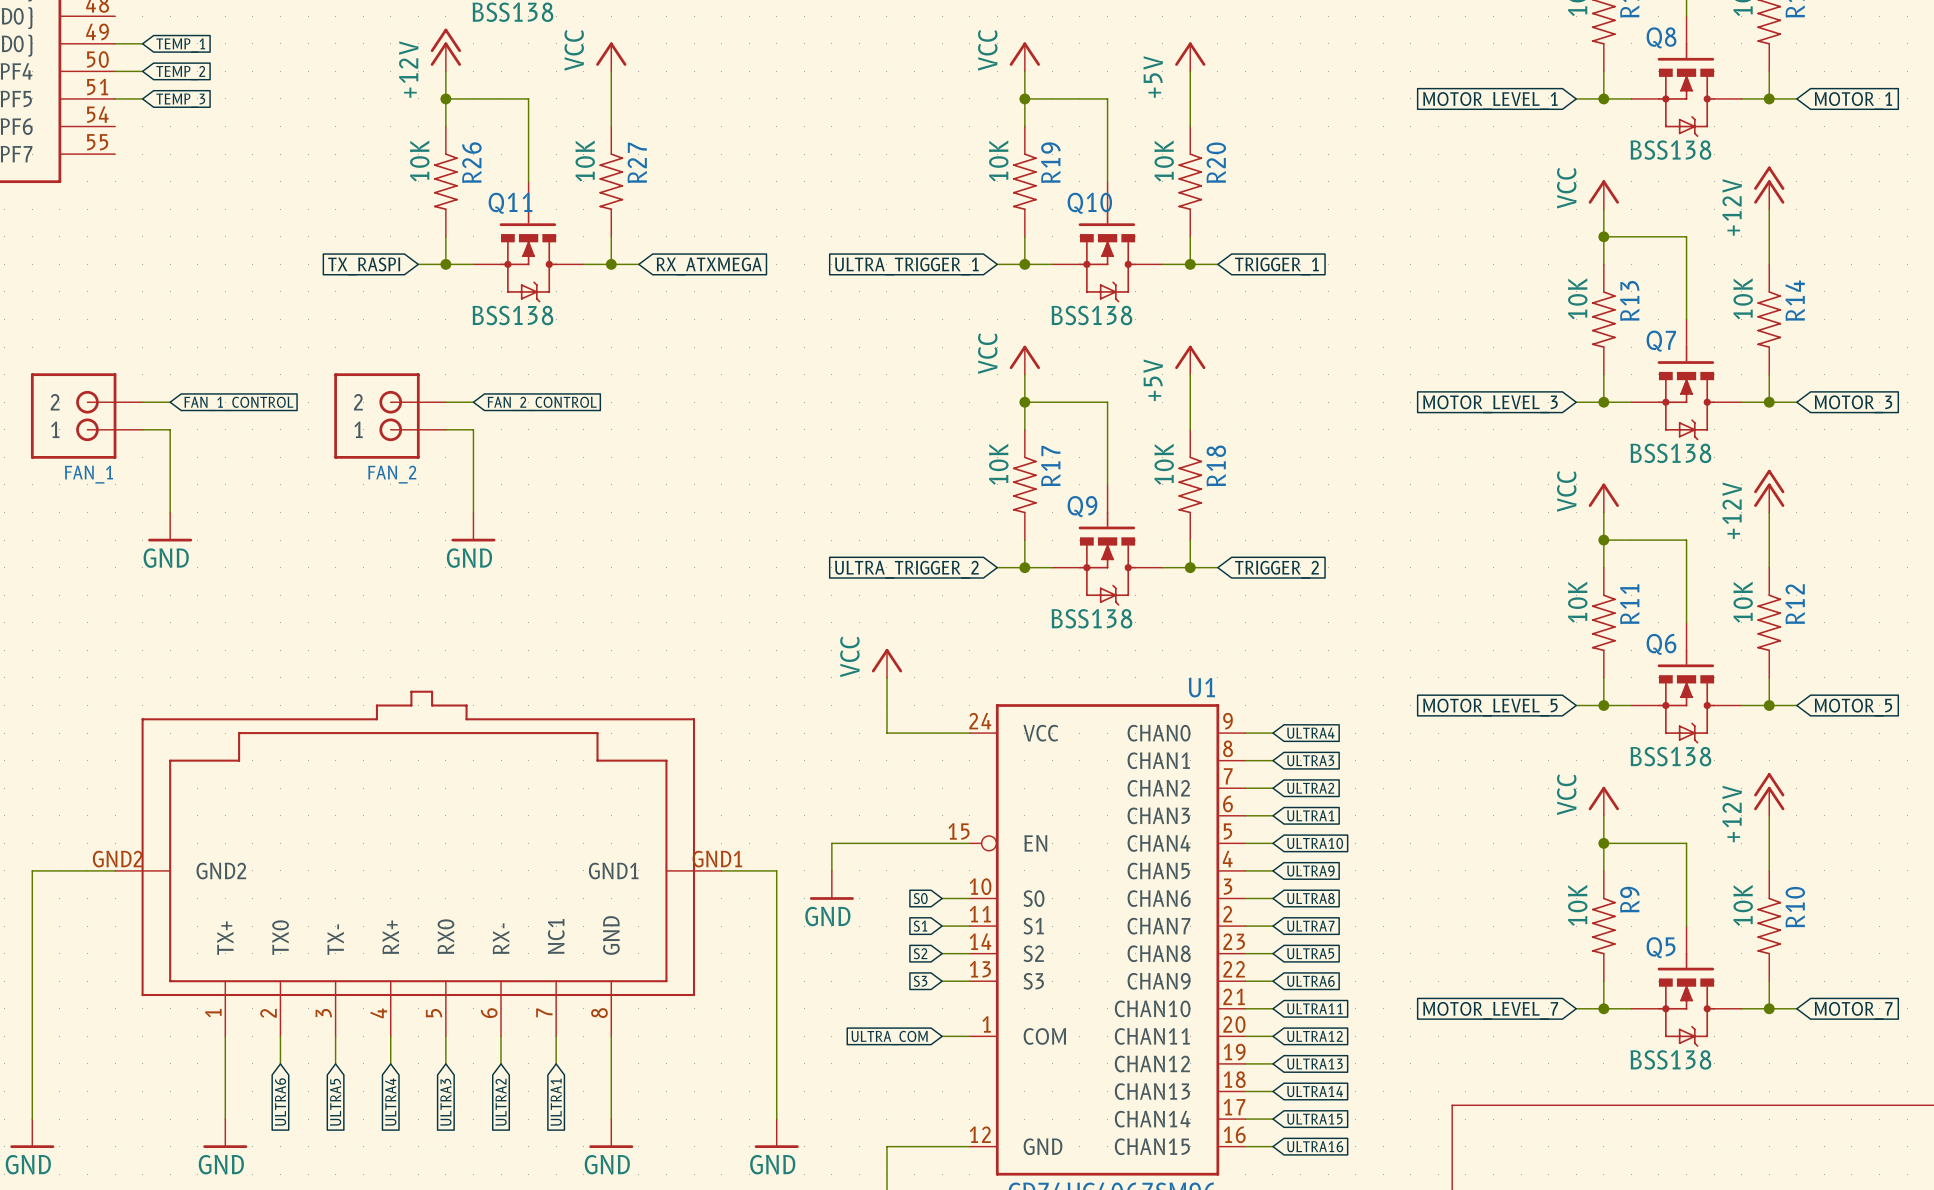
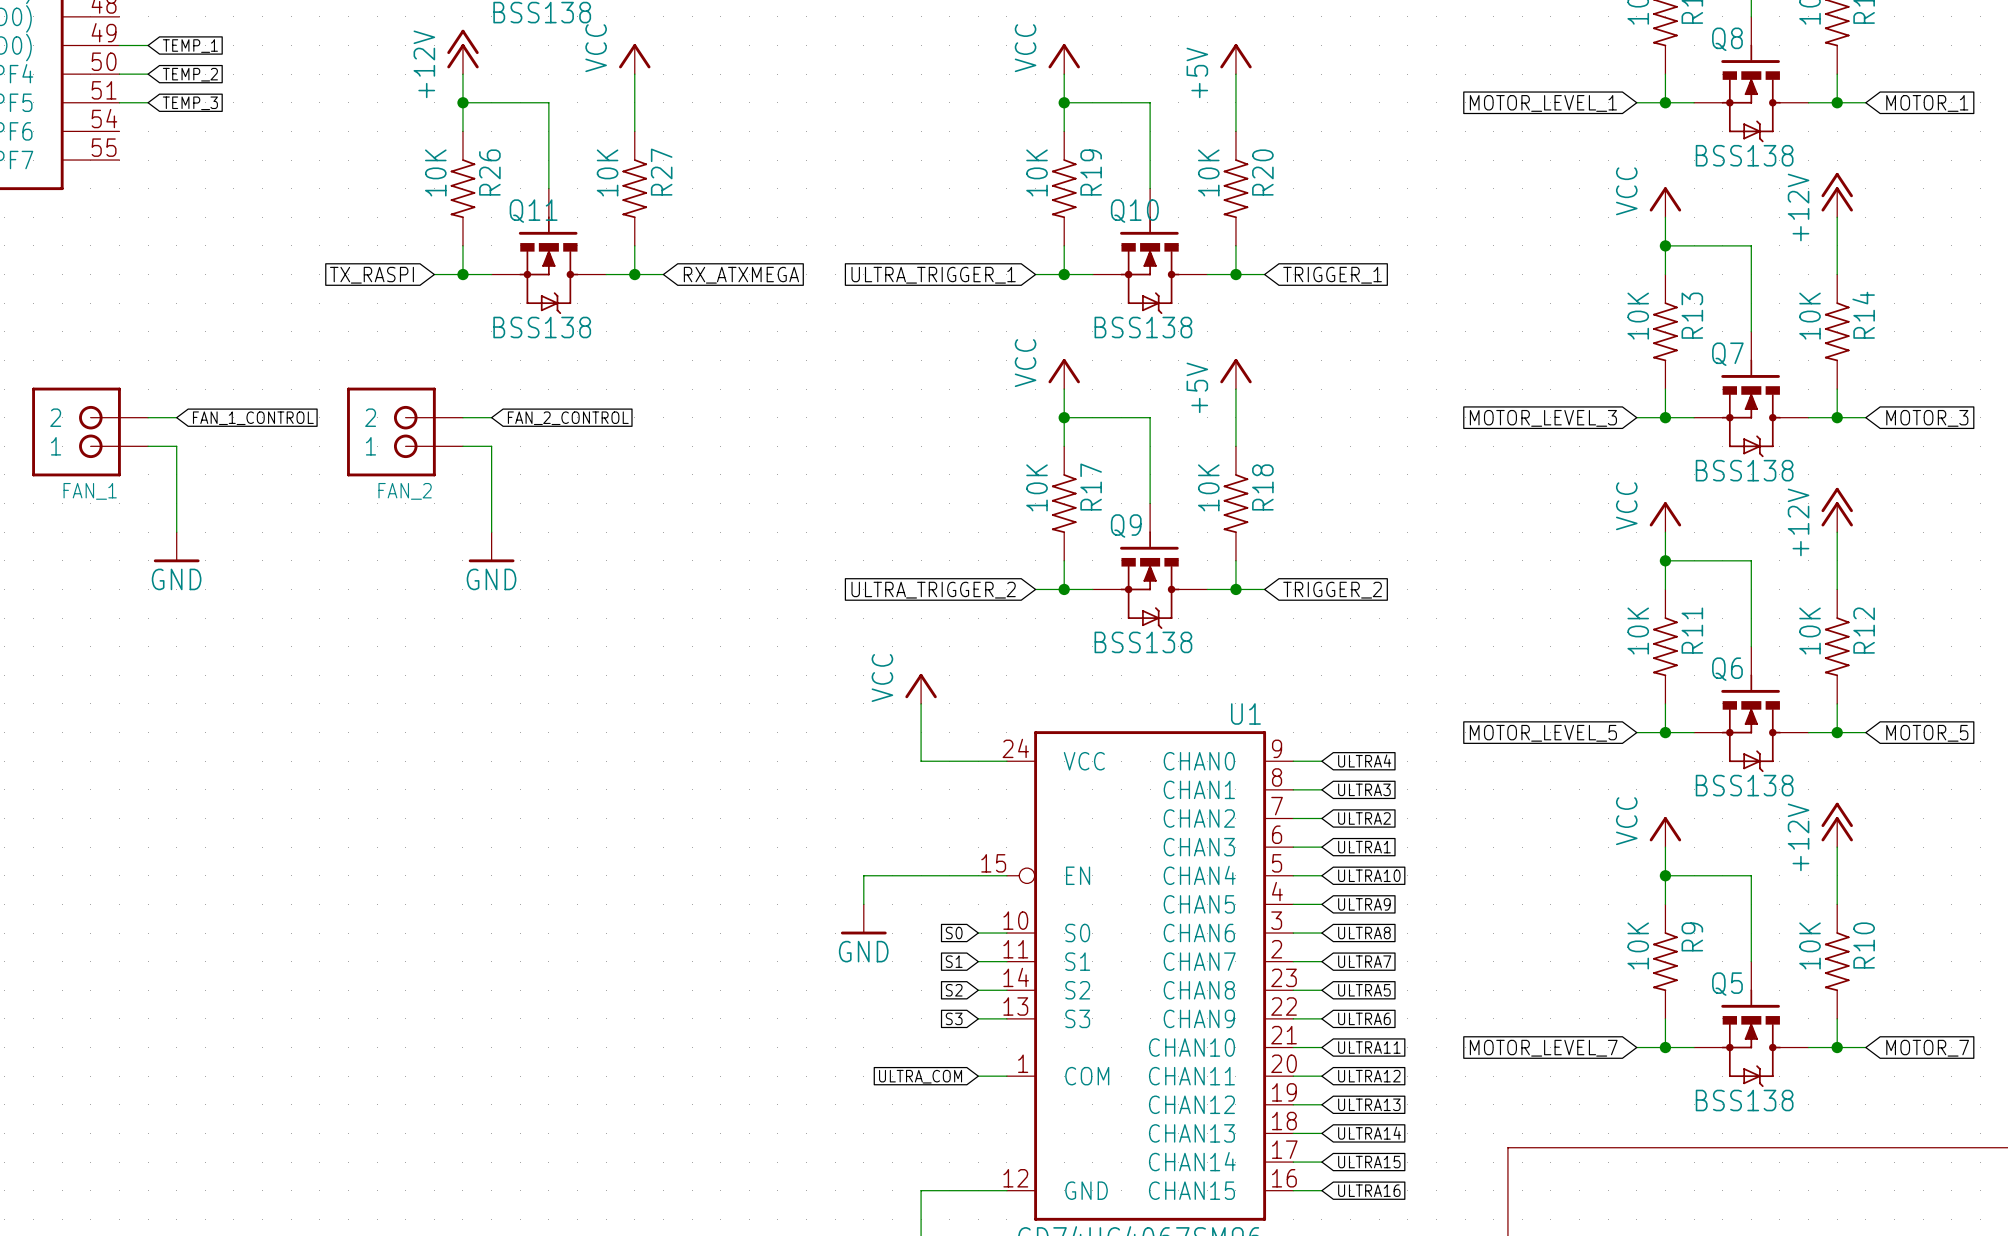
part: (418, 863) -> none
wire: (115, 870) (32, 870) (32, 1119) -> none
wire: (721, 870) (776, 870) (776, 1119) -> none
wire: (225, 1036) (225, 1119) -> none
wire: (280, 1036) (280, 1063) -> none
wire: (335, 1036) (335, 1063) -> none
wire: (390, 1036) (390, 1063) -> none
wire: (445, 1036) (445, 1063) -> none
wire: (501, 1036) (501, 1063) -> none
wire: (556, 1036) (556, 1063) -> none
wire: (611, 1036) (611, 1119) -> none
global label: ULTRA6 (280, 1102) -> none
global label: ULTRA5 (335, 1102) -> none
global label: ULTRA4 (390, 1102) -> none
global label: ULTRA3 (445, 1102) -> none
global label: ULTRA2 (501, 1102) -> none
global label: ULTRA1 (556, 1102) -> none
power symbol: GND (32, 1133) -> none
power symbol: GND (225, 1133) -> none
power symbol: GND (611, 1133) -> none
power symbol: GND (776, 1133) -> none

